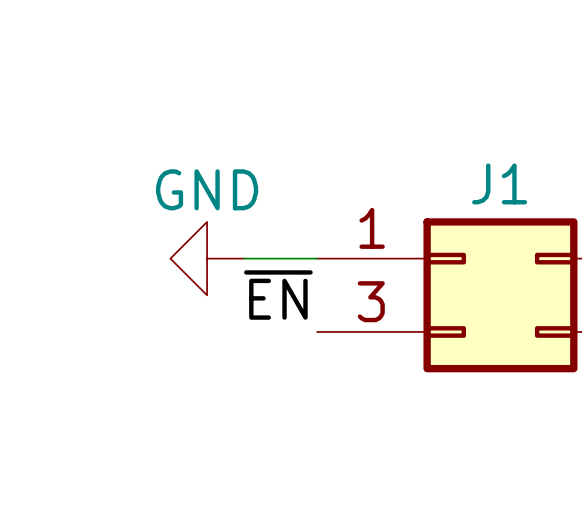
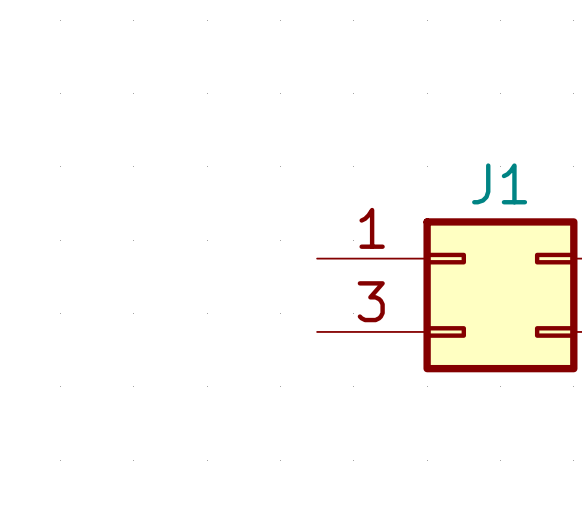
power symbol: GND (207, 258) -> none
wire: (243, 258) (317, 258) -> none
label: ~{EN} (278, 295) -> none

